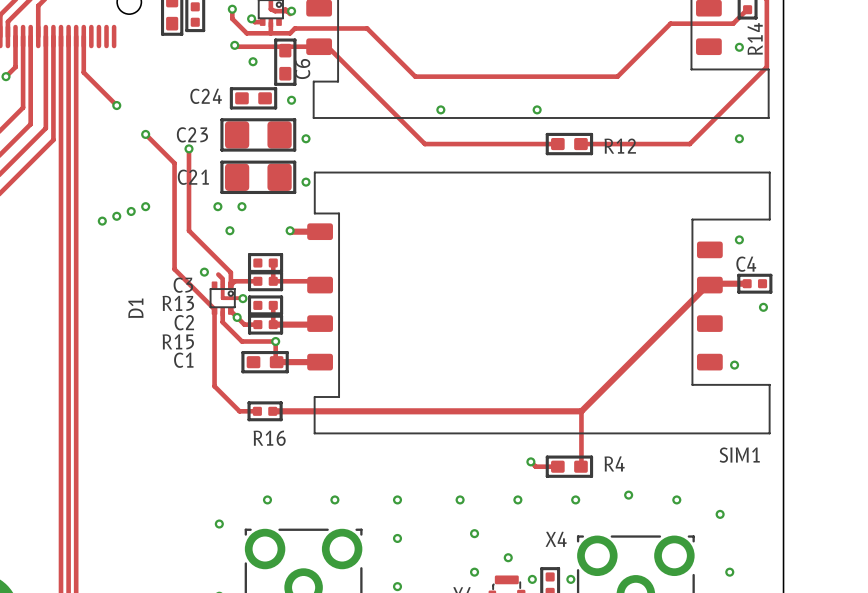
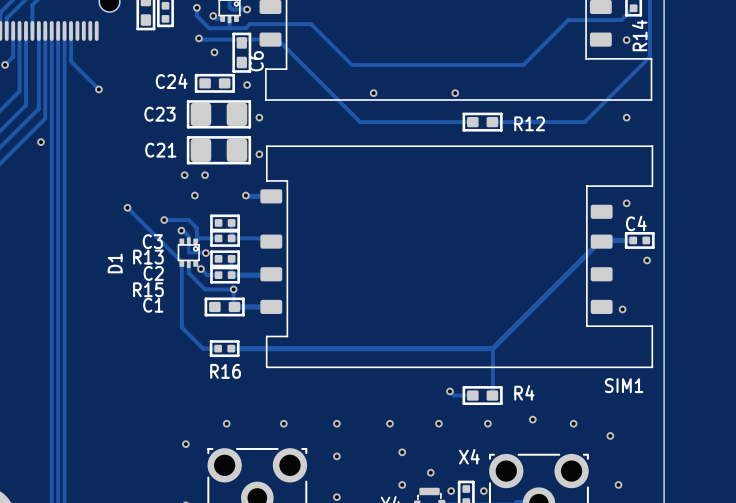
track: (145, 134) (174, 163) (174, 269) -> (127, 207) (147, 228)
via: (145, 134) -> none
track: (188, 148) (188, 230) (230, 272) (230, 285) -> none
via: (188, 148) -> none
via: none -> (41, 142)
via: (145, 206) -> none
via: (131, 211) -> none
via: (116, 216) -> none
via: (102, 221) -> none
via: none -> (127, 207)
track: none -> (164, 220) (188, 220) (196, 228) (196, 236) (199, 238)
via: none -> (164, 220)
via: (204, 272) -> none
via: none -> (181, 230)

